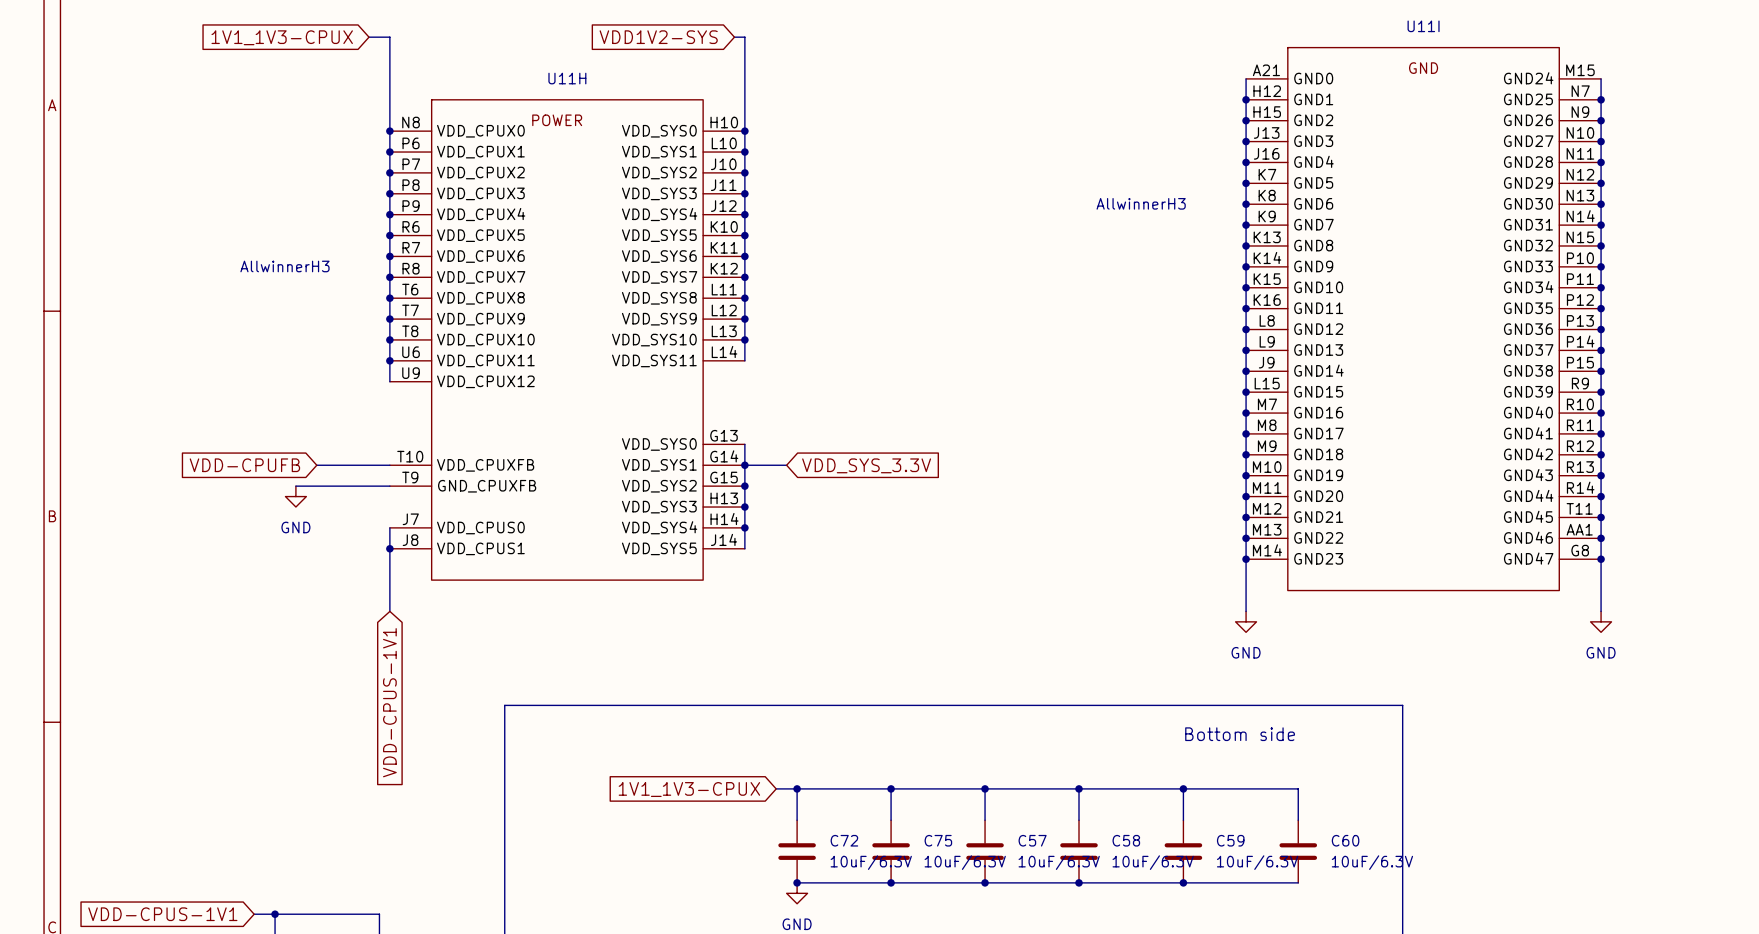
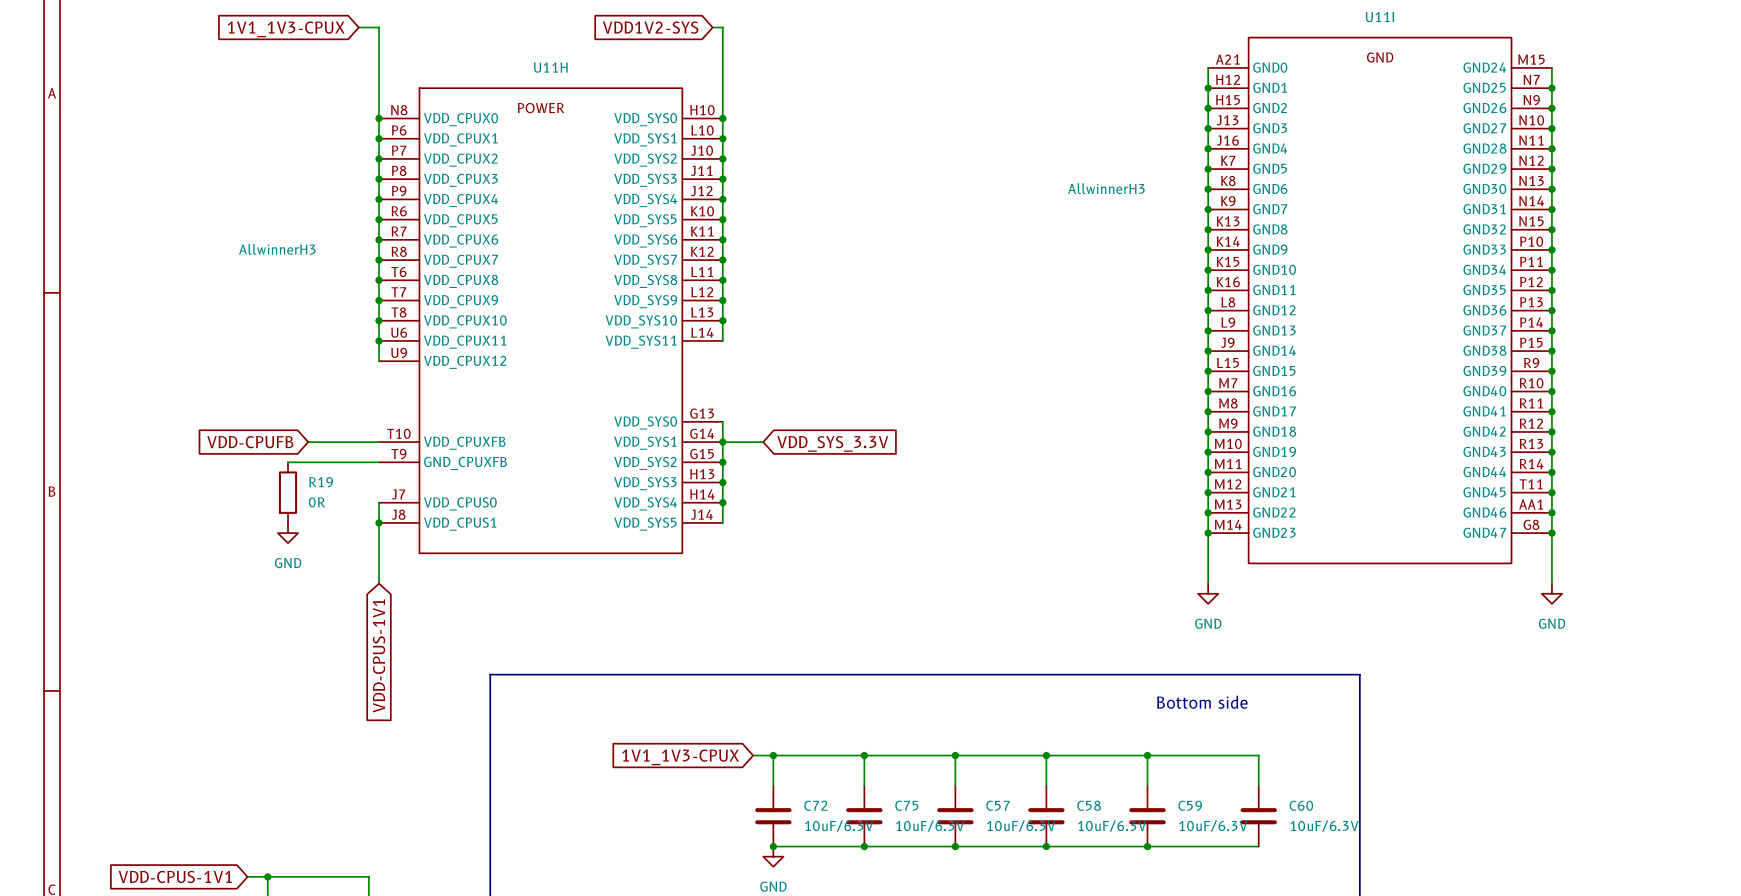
power symbol position: GND (295, 496) -> GND (288, 533)
R19: none -> 0R (288, 492)

